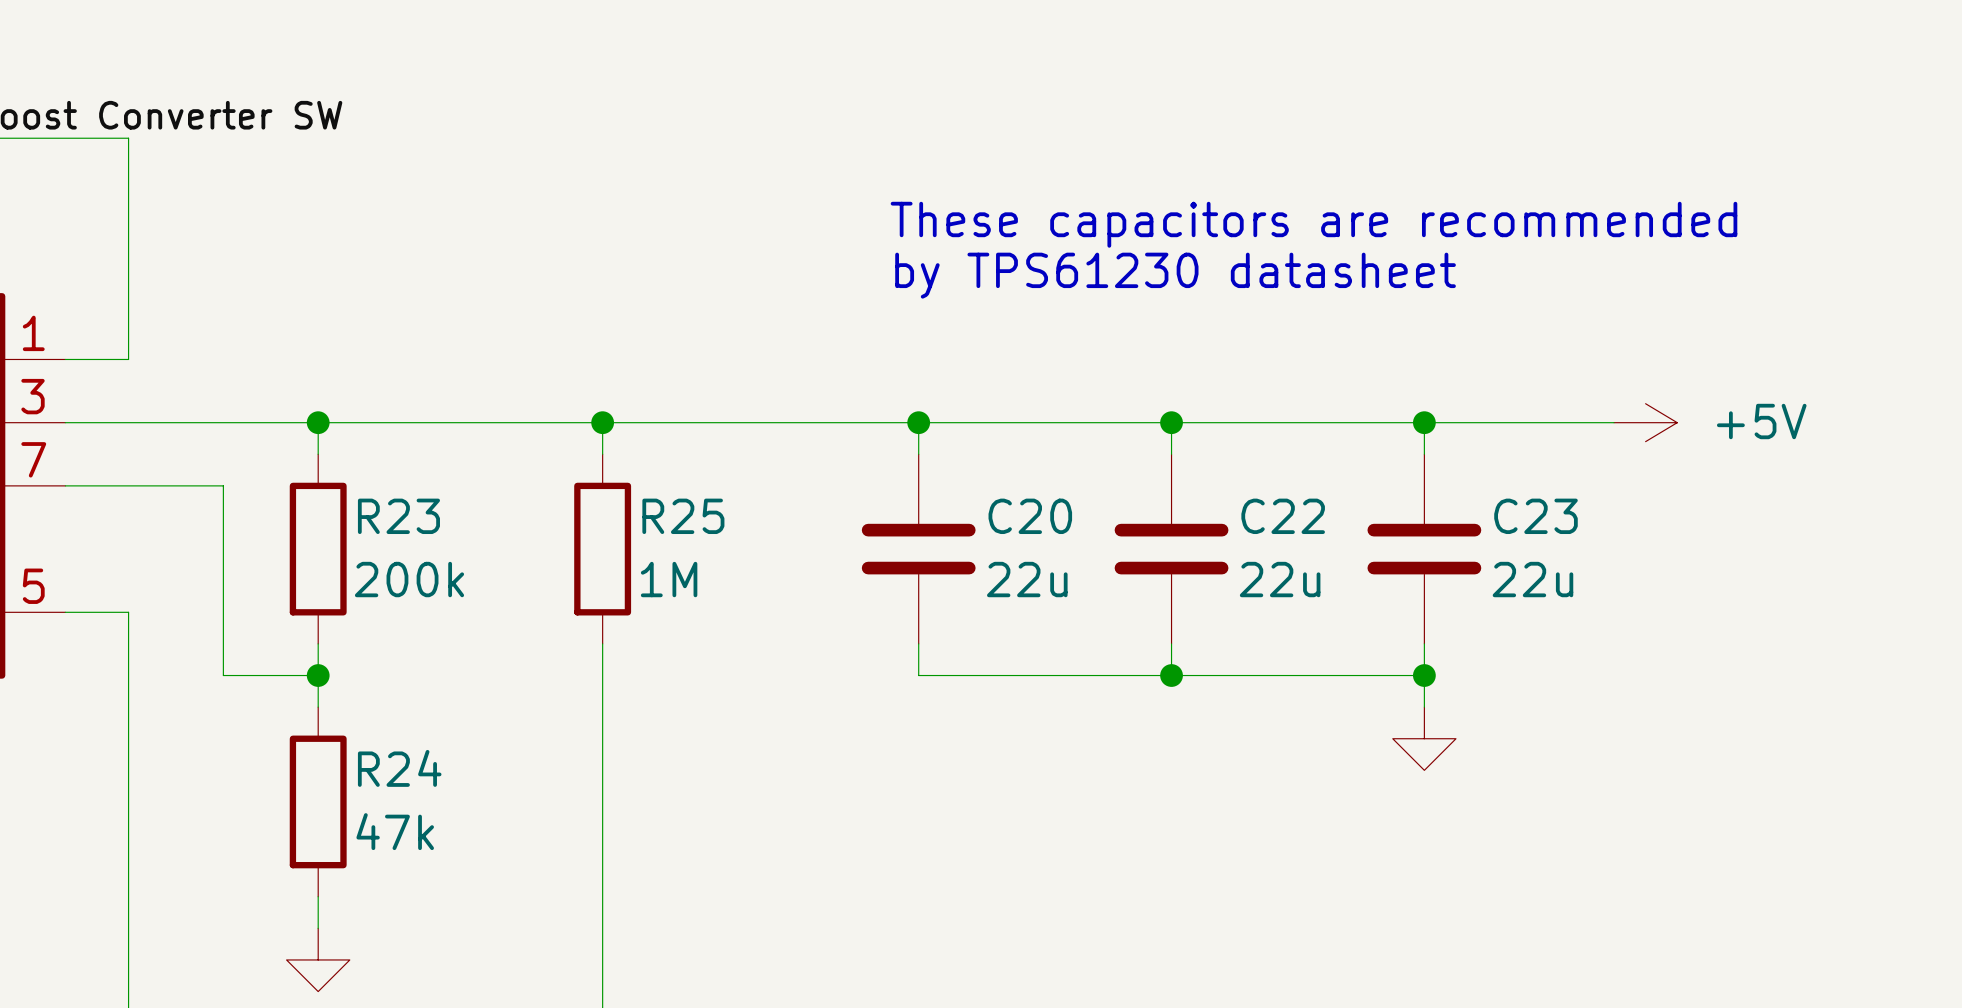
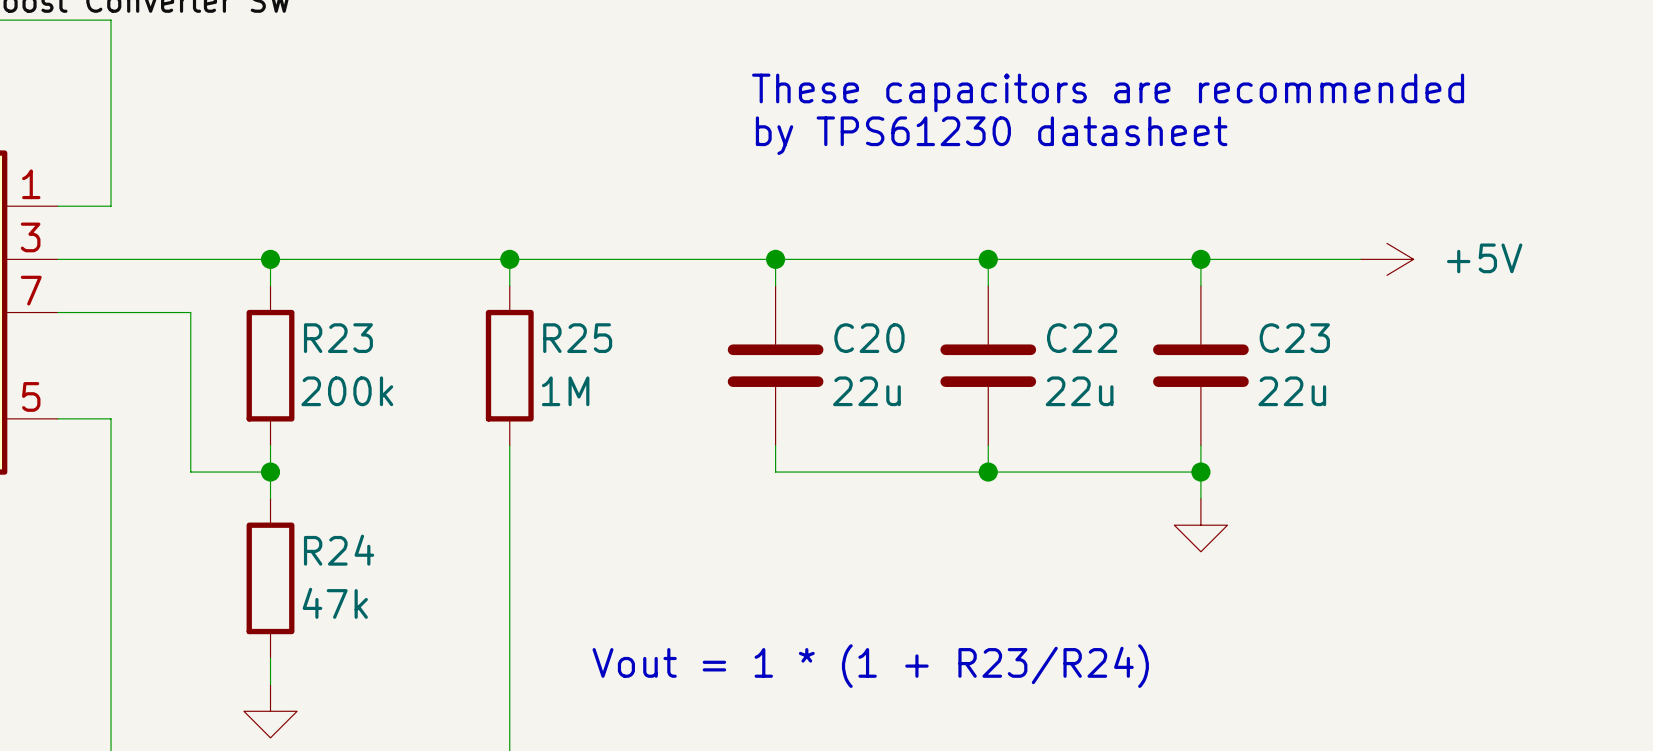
text: none -> Vout = 1 * (1 + R23/R24) (870, 666)

